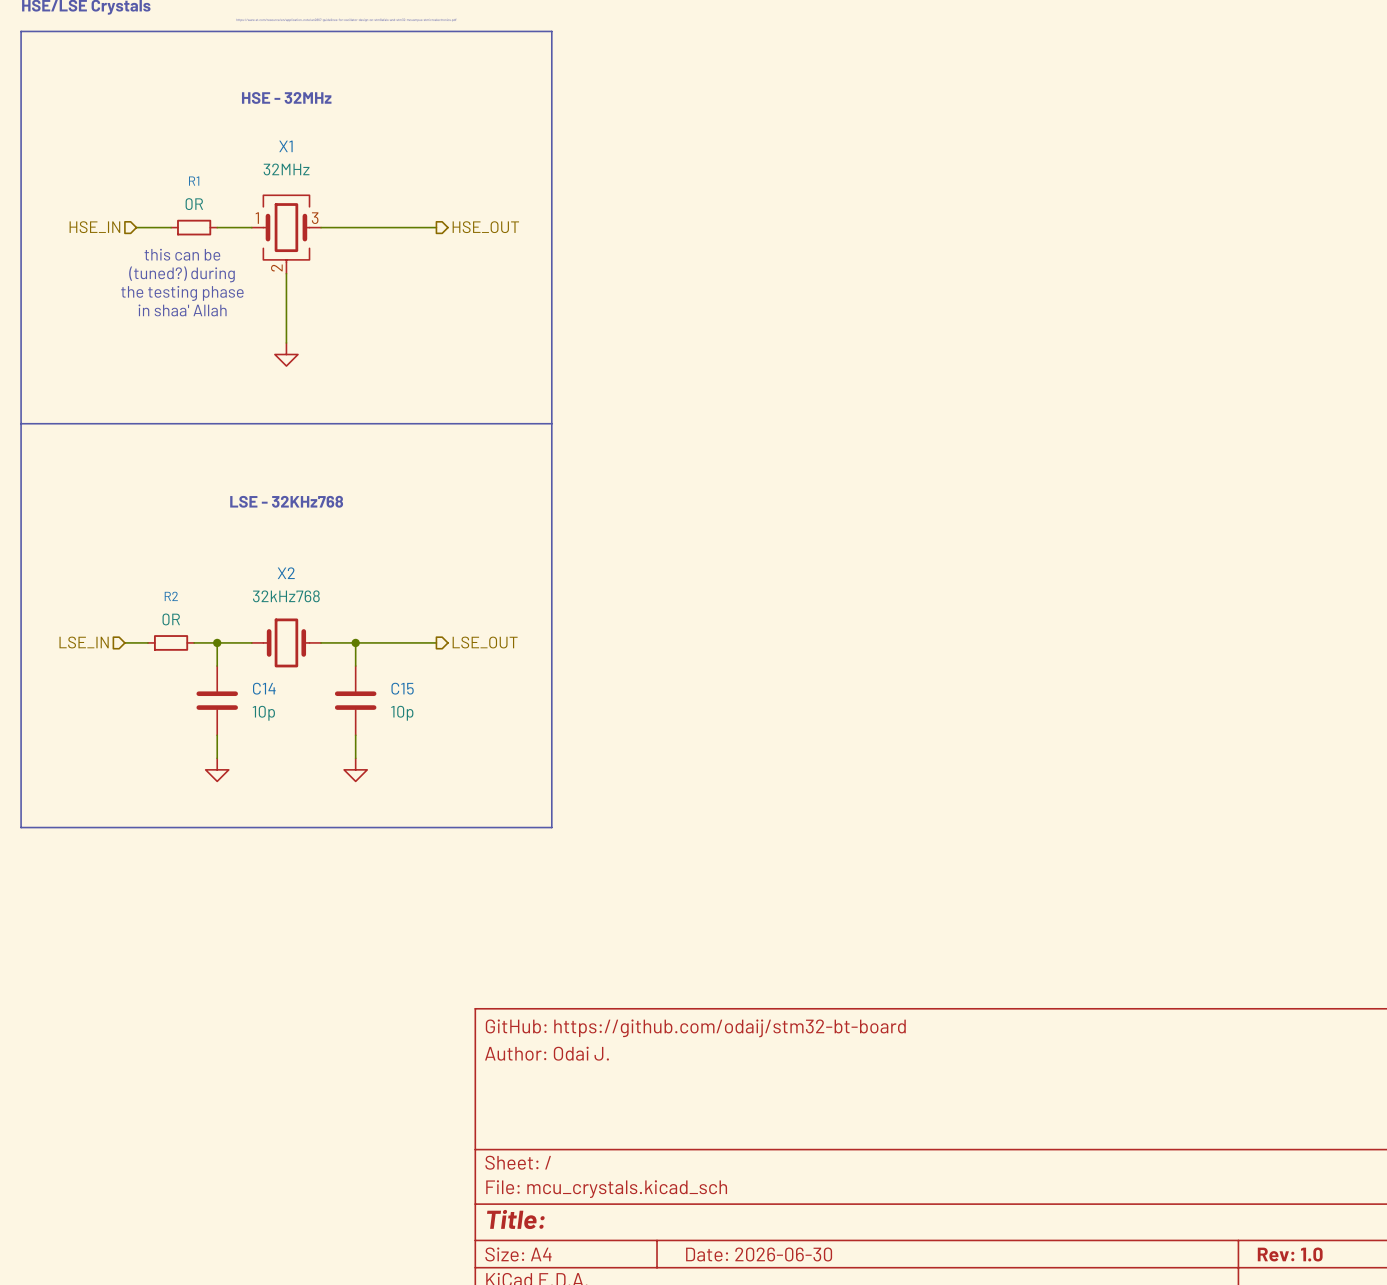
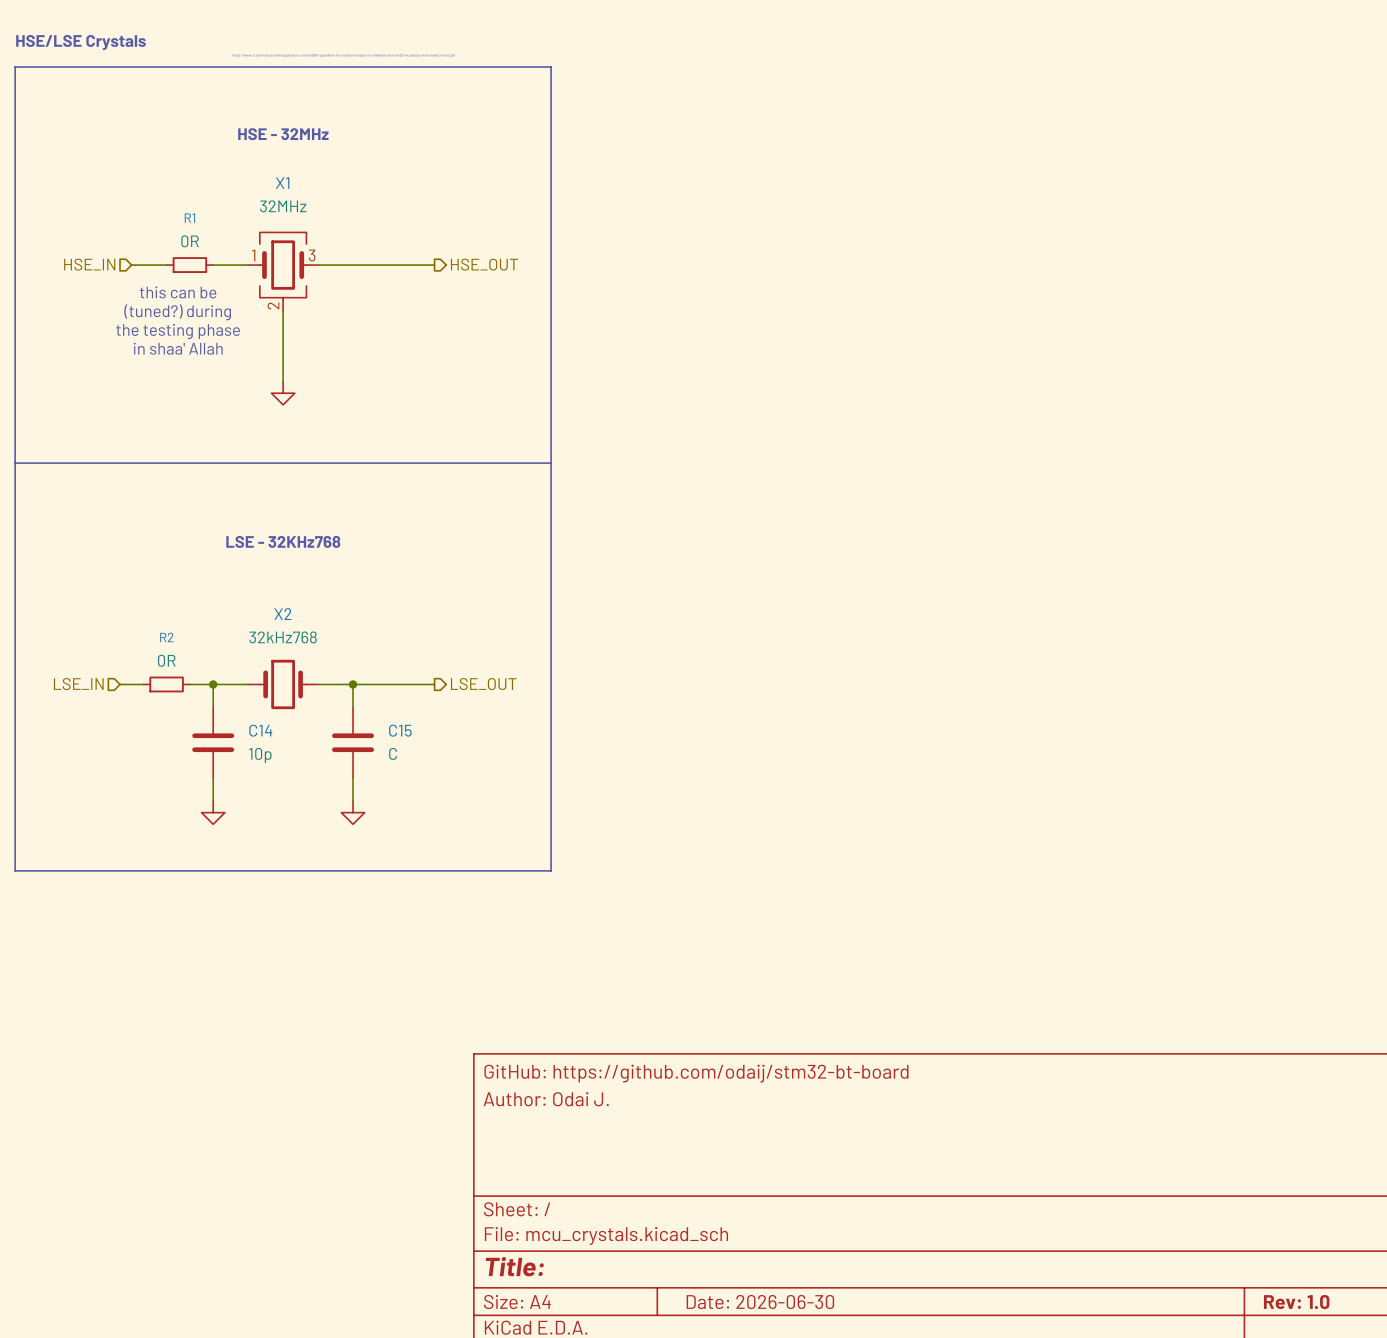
C15 value: 10p (402, 713) -> C (393, 753)

